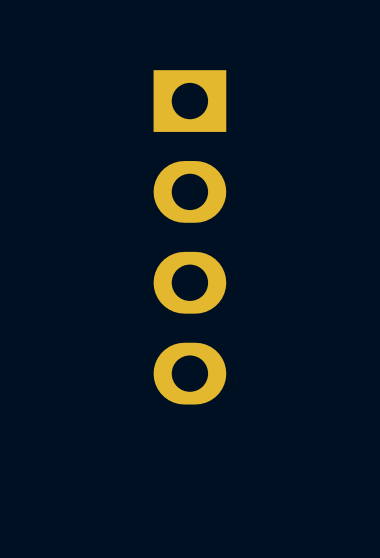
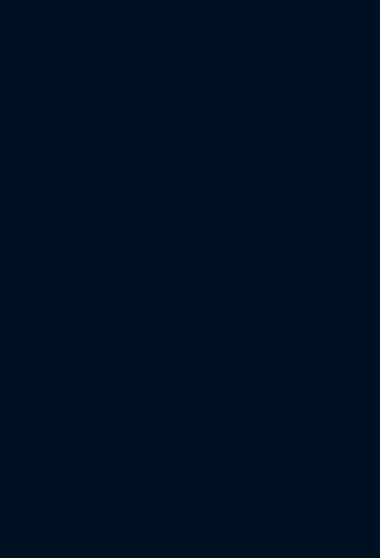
part: (189, 237) -> none

